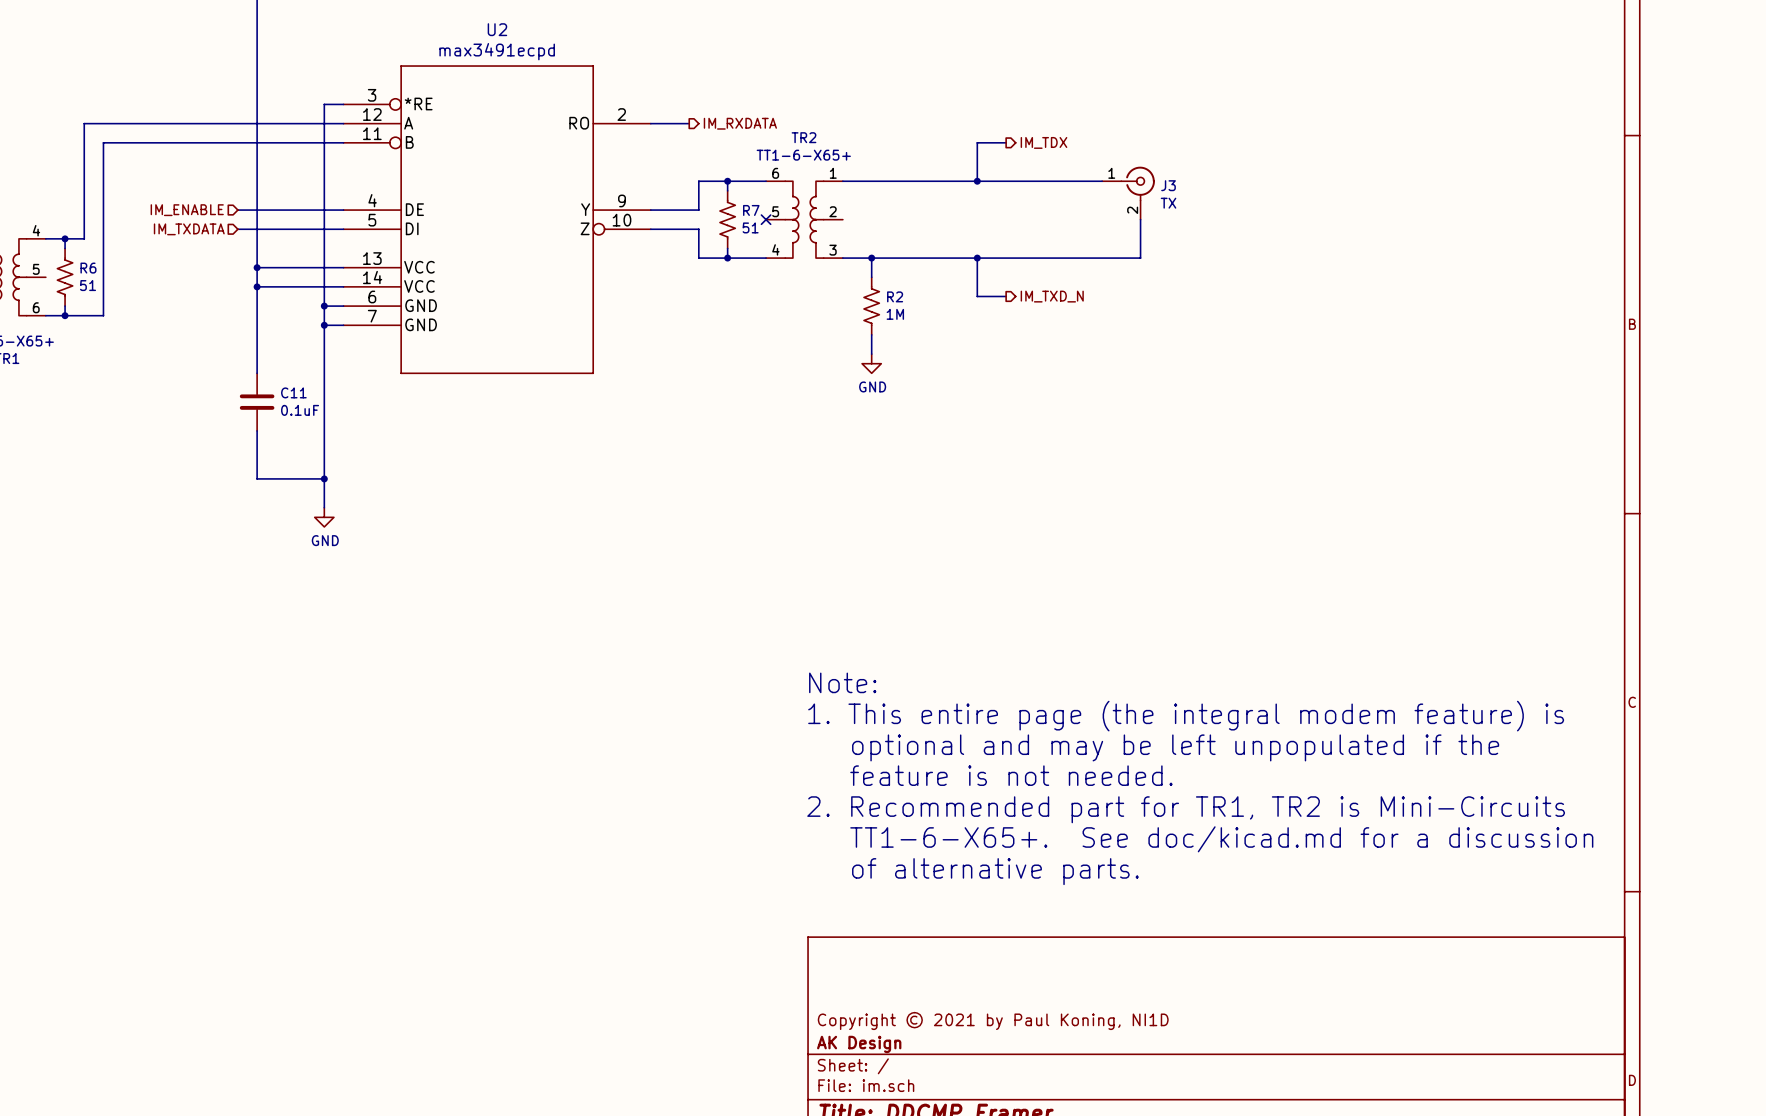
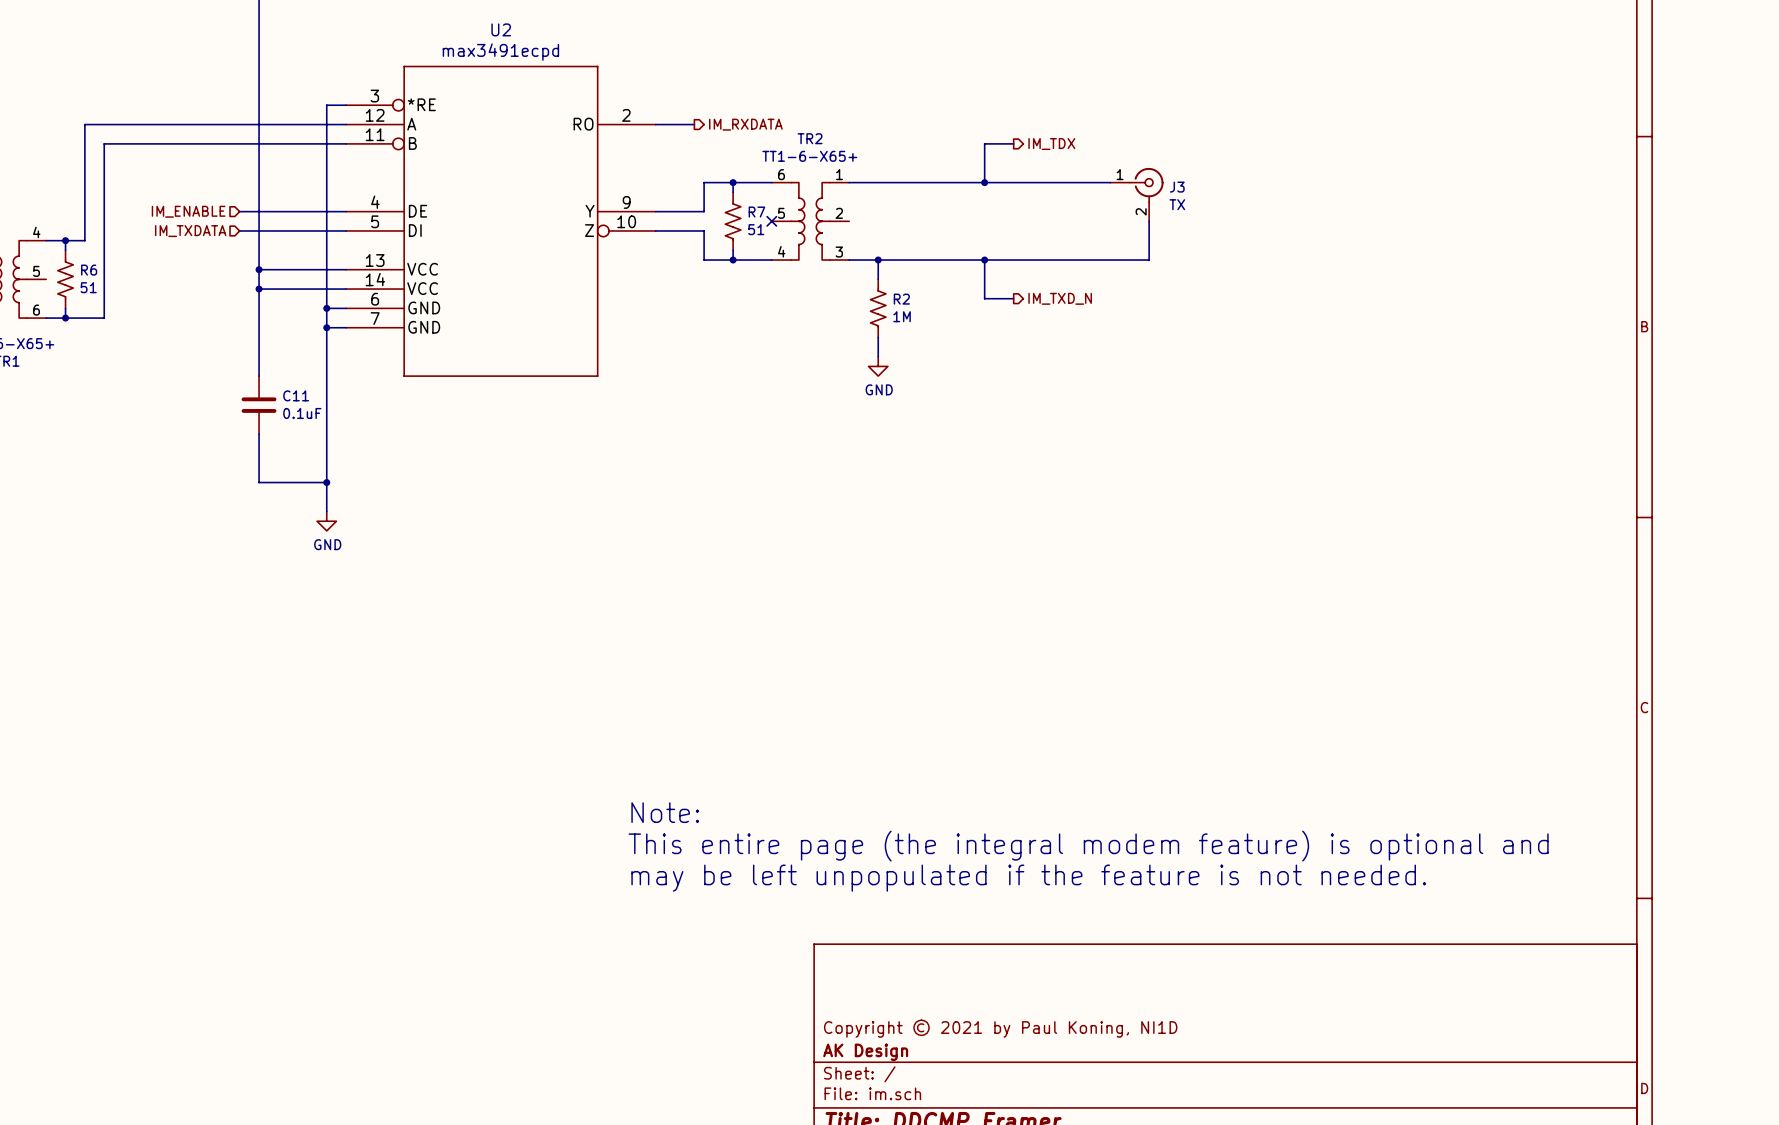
text: Note: (842, 682) -> none
text: 1. This entire page (the integral modem feature) is (1186, 716) -> none
text: optional and may be left unpopulated if the (1175, 747) -> none
text: feature is not needed. (1011, 775) -> none
text: none -> Note: (665, 812)
text: 2. Recommended part for TR1, TR2 is Mini-Circuits (1186, 809) -> none
text: none -> This entire page (the integral modem feature) is optional and (1088, 846)
text: TT1-6-X65+. See doc/kicad.md for a discussion (1221, 839) -> none
text: of alternative parts. (995, 871) -> none
text: none -> may be left unpopulated if the feature is not needed. (1028, 878)

